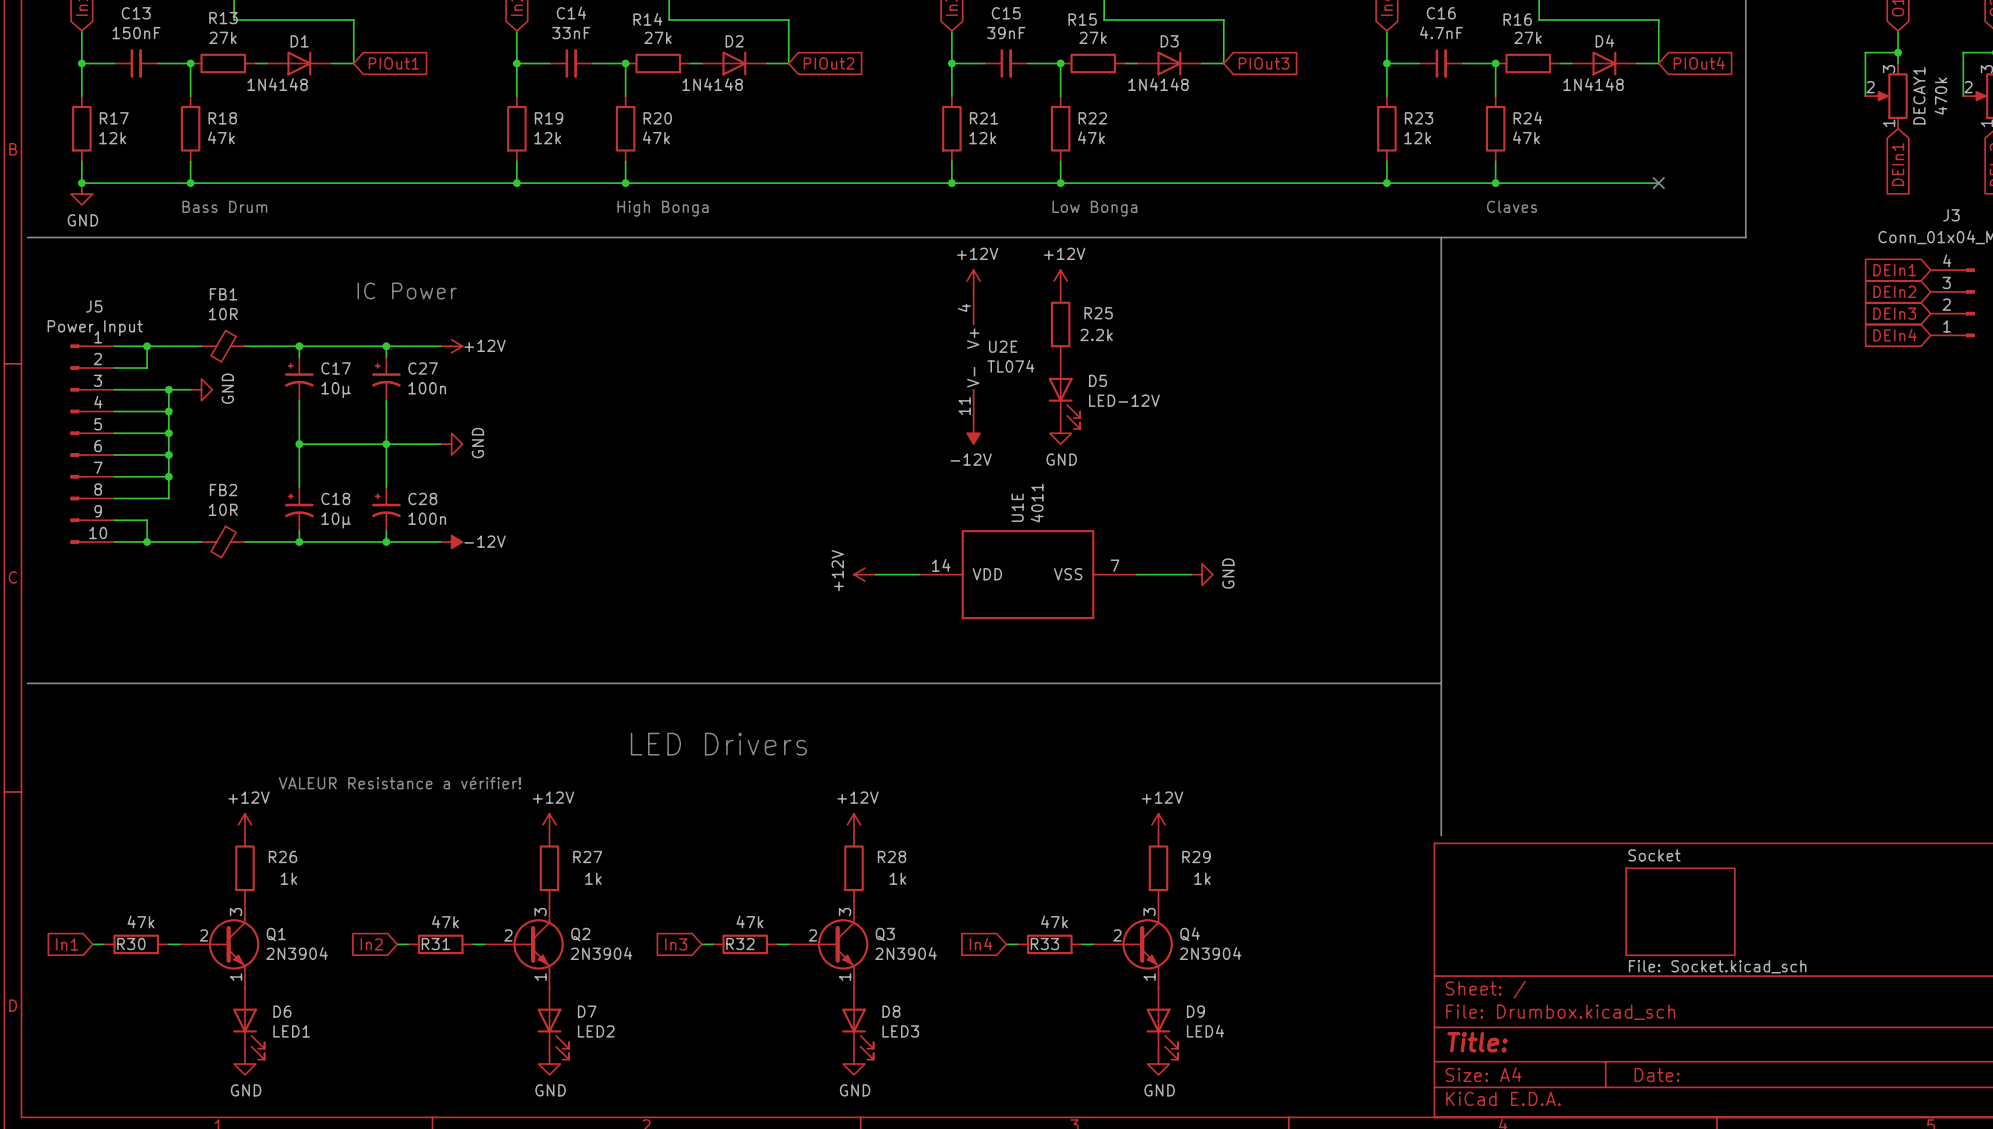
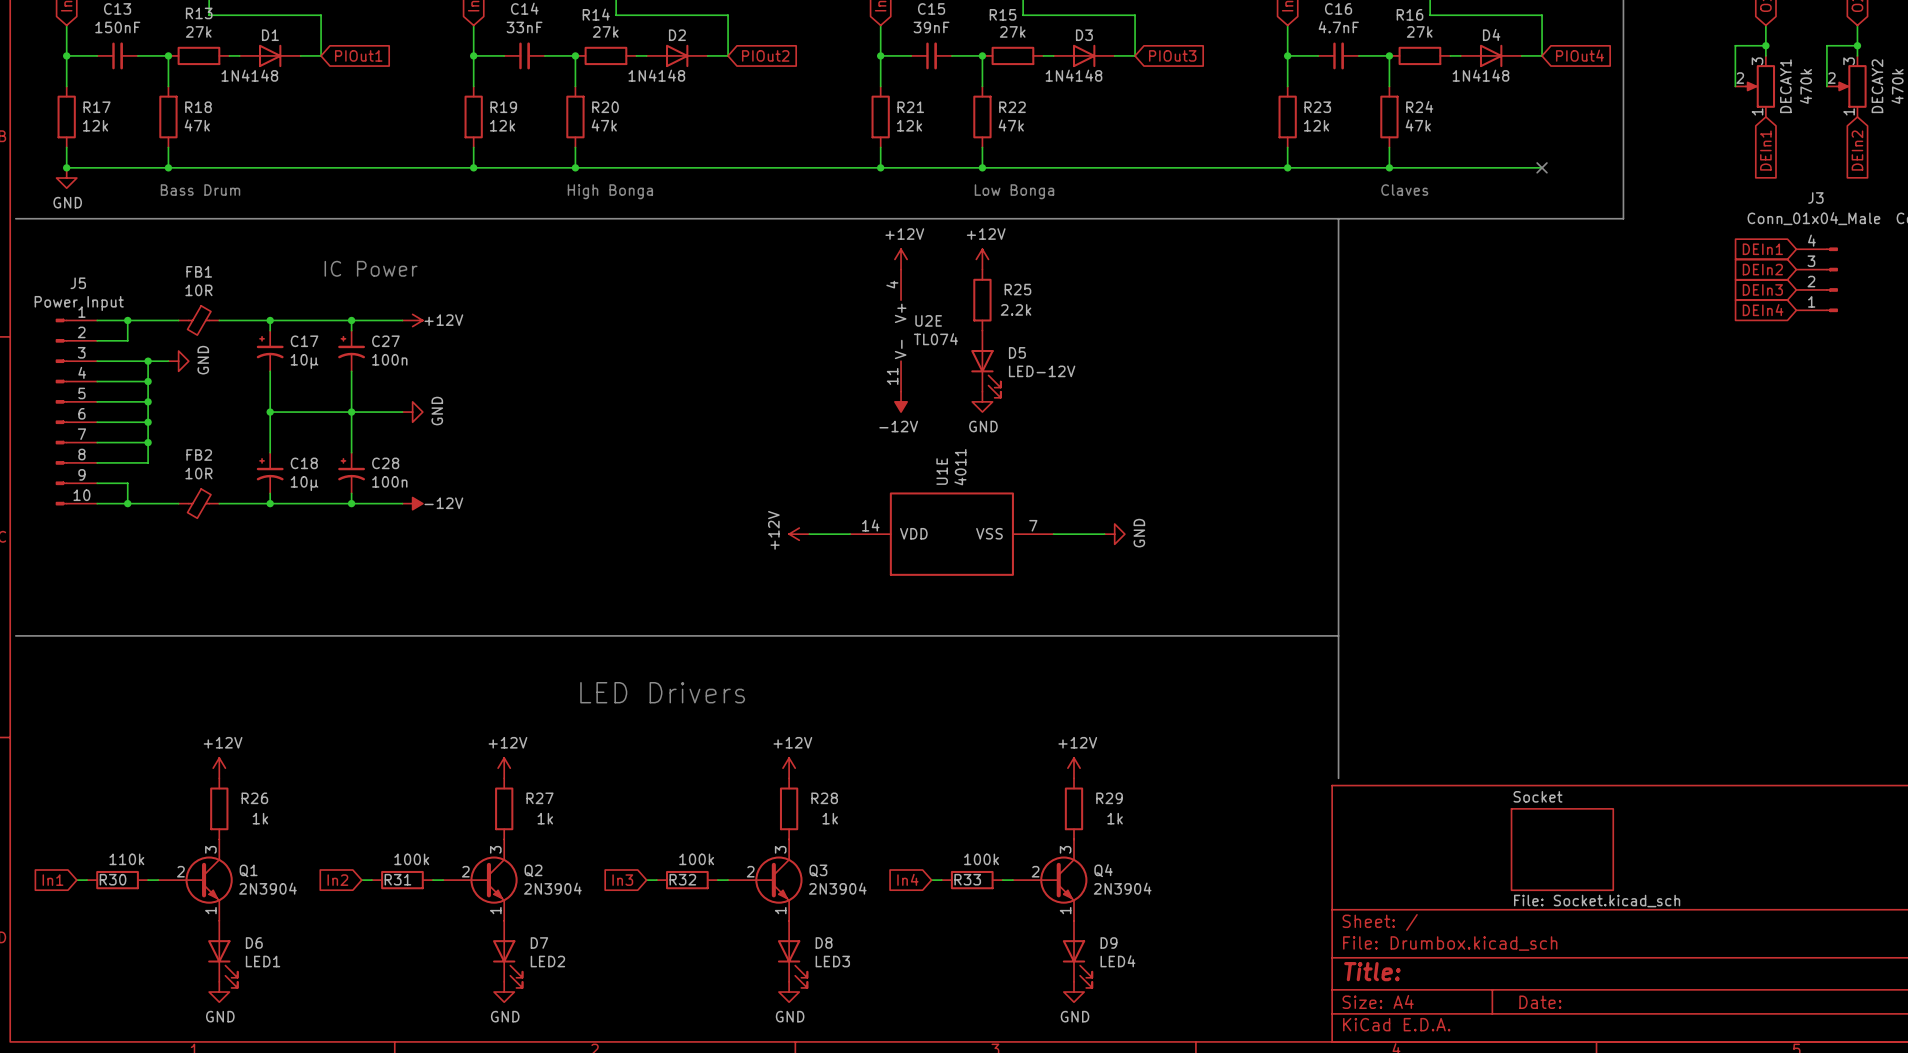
text: VALEUR Resistance a vérifier! (399, 782) -> none
R30 value: 47k (140, 921) -> 110k (126, 859)
R31 value: 47k (445, 921) -> 100k (411, 859)
R32 value: 47k (749, 921) -> 100k (696, 859)
R33 value: 47k (1054, 921) -> 100k (981, 859)

